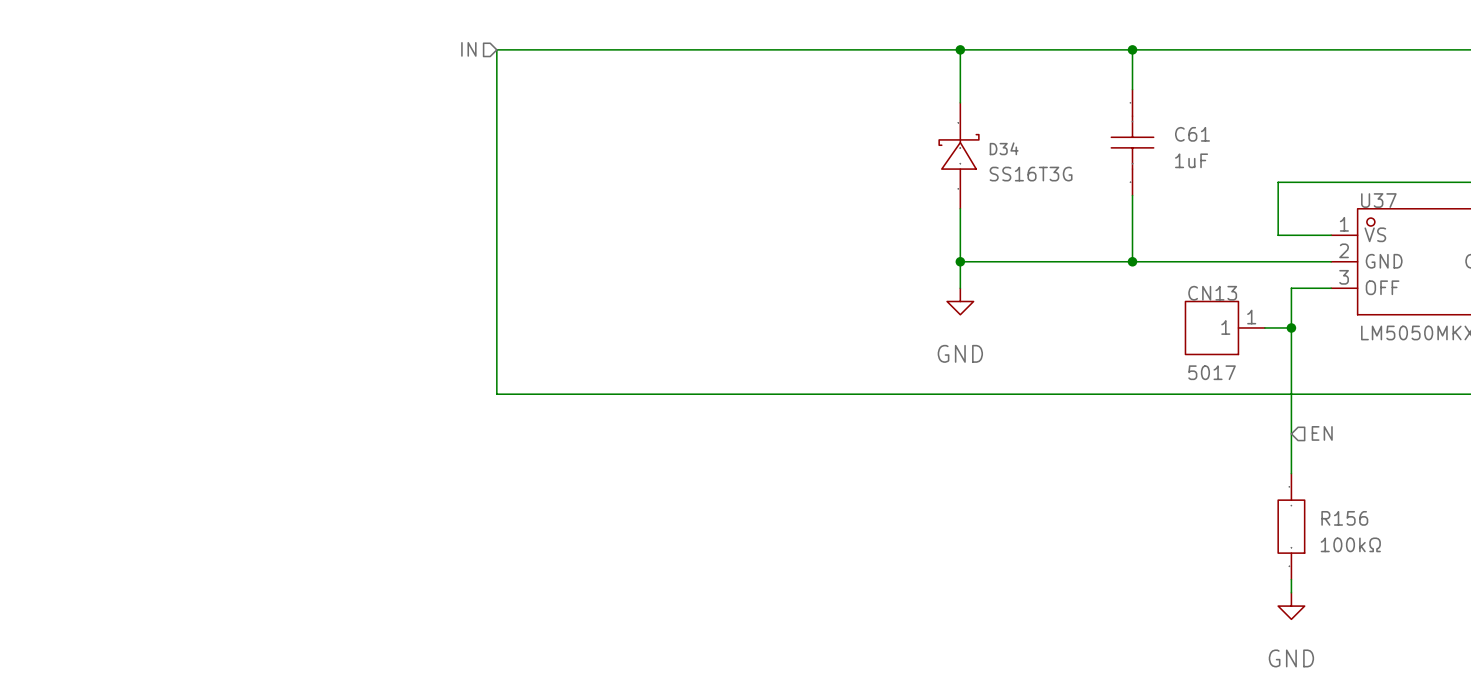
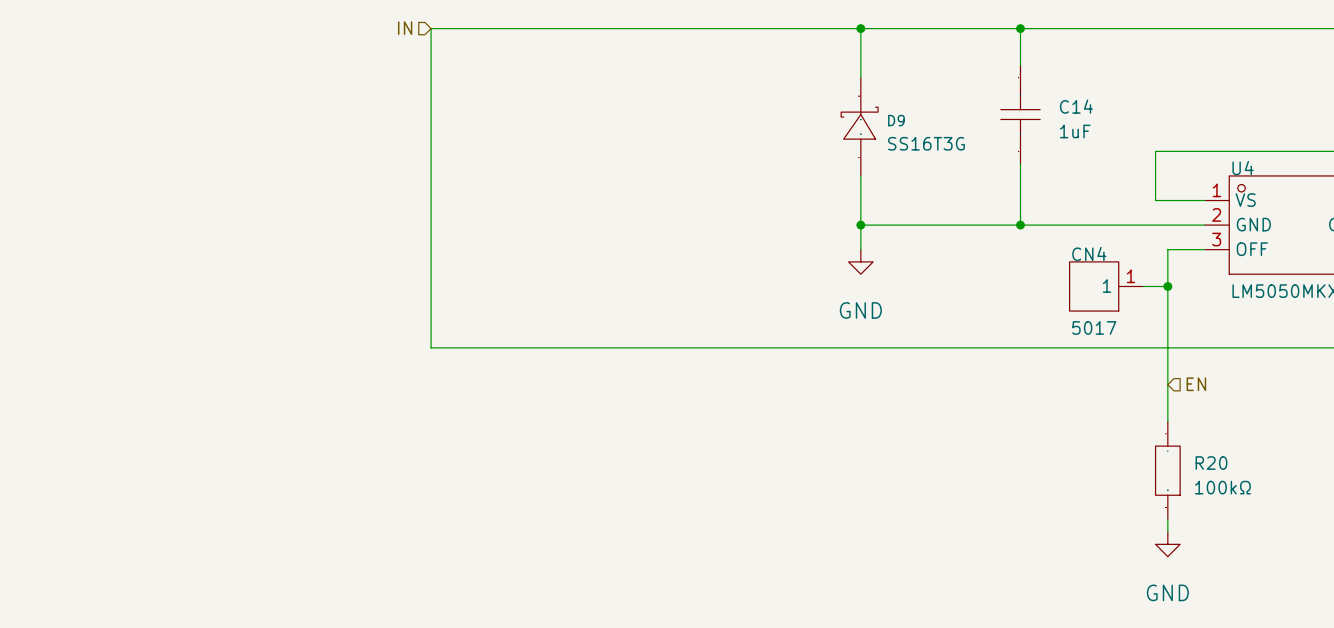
C61 name: C61 (1192, 134) -> C14 (1076, 106)
D34 name: D34 (1004, 148) -> D9 (896, 120)
U37 name: U37 (1378, 200) -> U4 (1243, 168)
CN13 name: CN13 (1212, 293) -> CN4 (1089, 253)
R156 name: R156 (1344, 518) -> R20 (1211, 463)

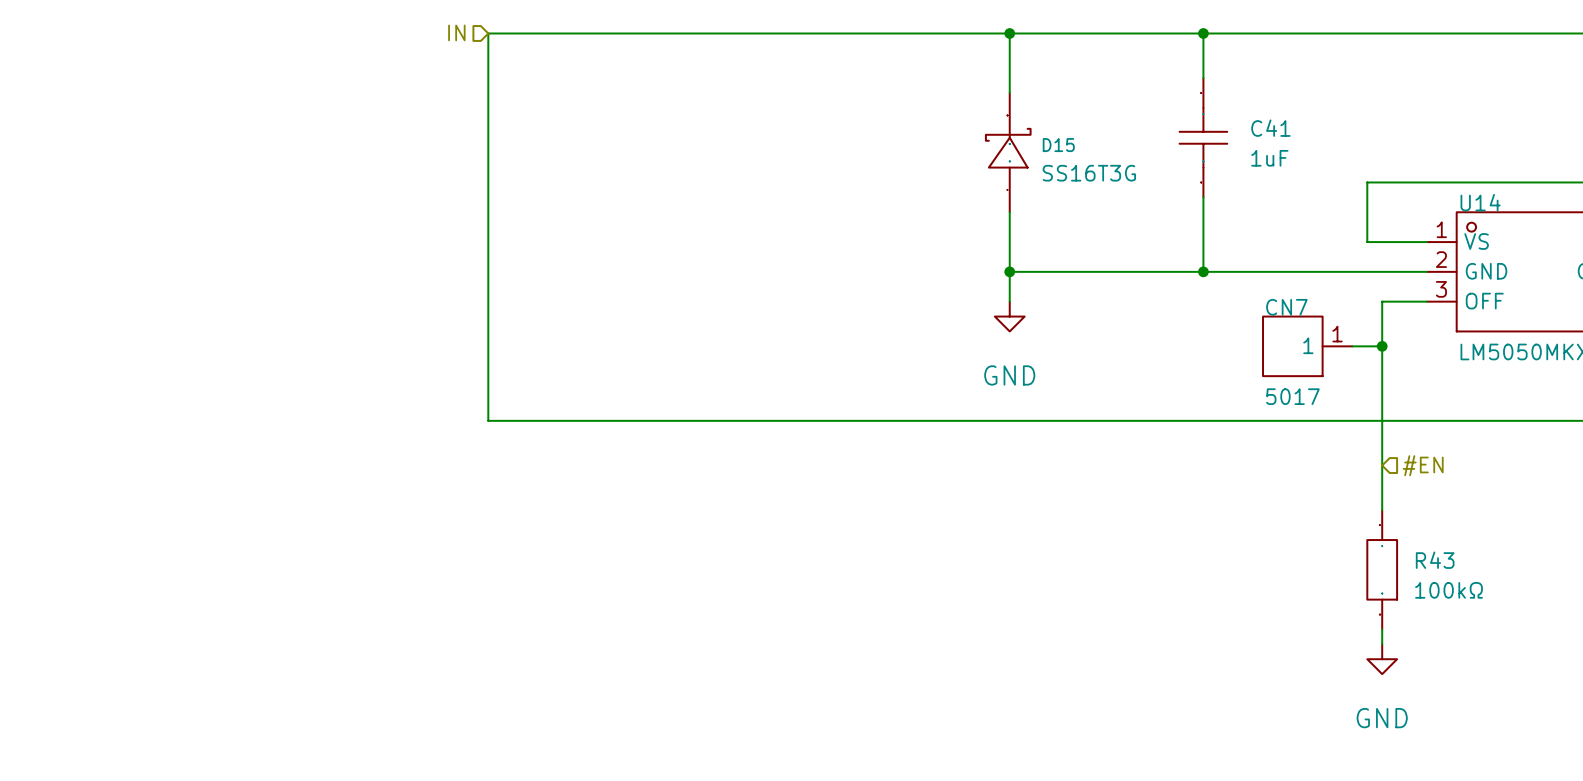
C14 name: C14 (1076, 106) -> C41 (1270, 128)
D9 name: D9 (896, 120) -> D15 (1058, 145)
U4 name: U4 (1243, 168) -> U14 (1480, 202)
CN4 name: CN4 (1089, 253) -> CN7 (1286, 307)
hierarchical label: EN (1196, 384) -> #EN (1423, 465)
R20 name: R20 (1211, 463) -> R43 (1435, 560)

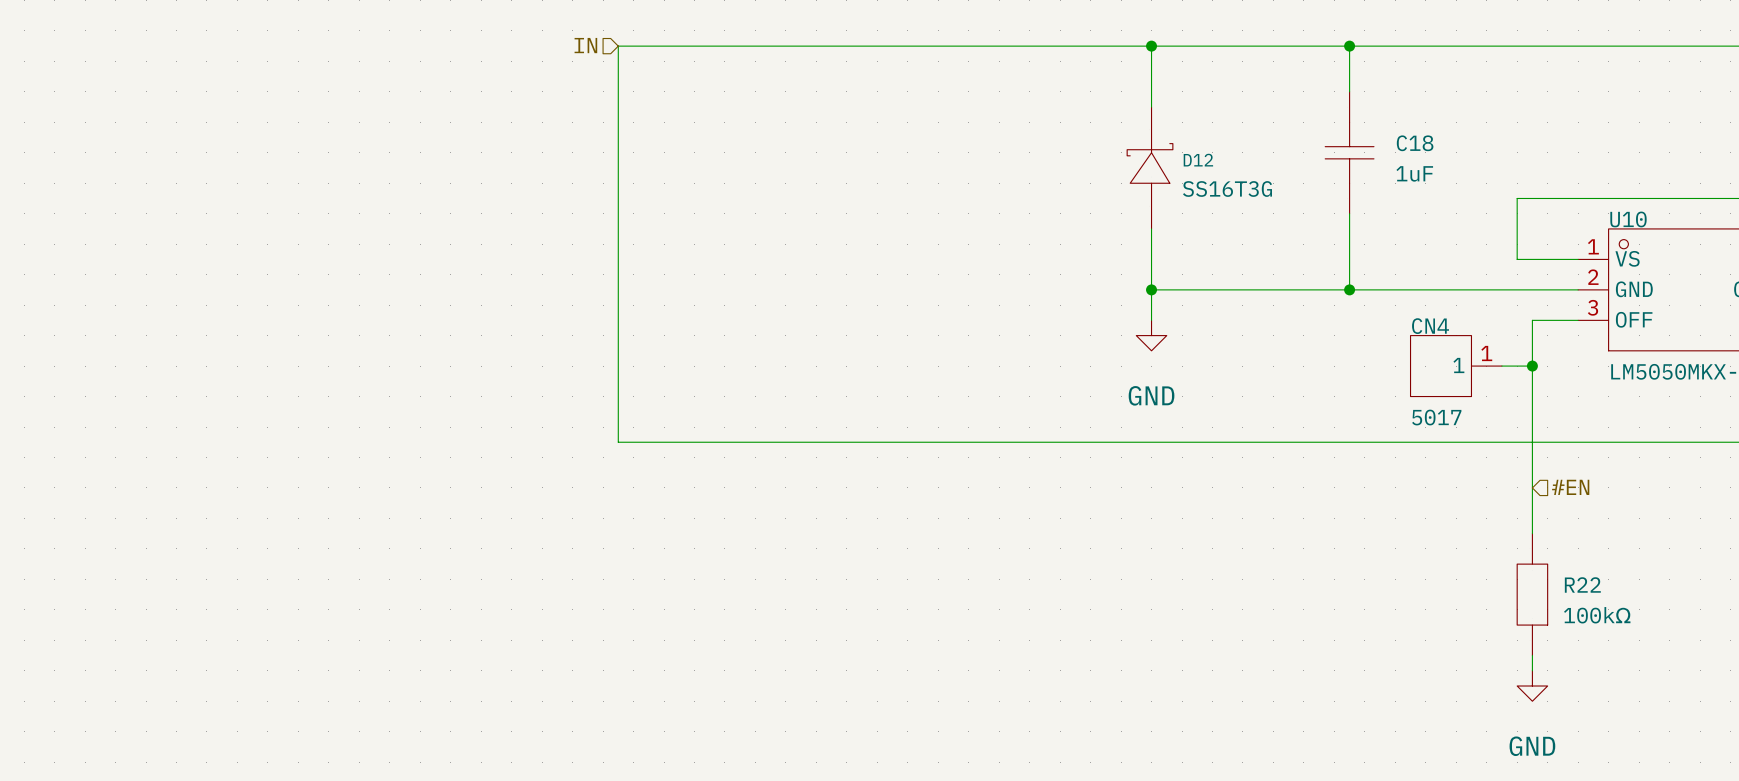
C41 name: C41 (1270, 128) -> C18 (1415, 143)
D15 name: D15 (1058, 145) -> D12 (1198, 160)
U14 name: U14 (1480, 202) -> U10 (1628, 219)
CN7 name: CN7 (1286, 307) -> CN4 (1430, 326)
R43 name: R43 (1435, 560) -> R22 (1582, 584)

